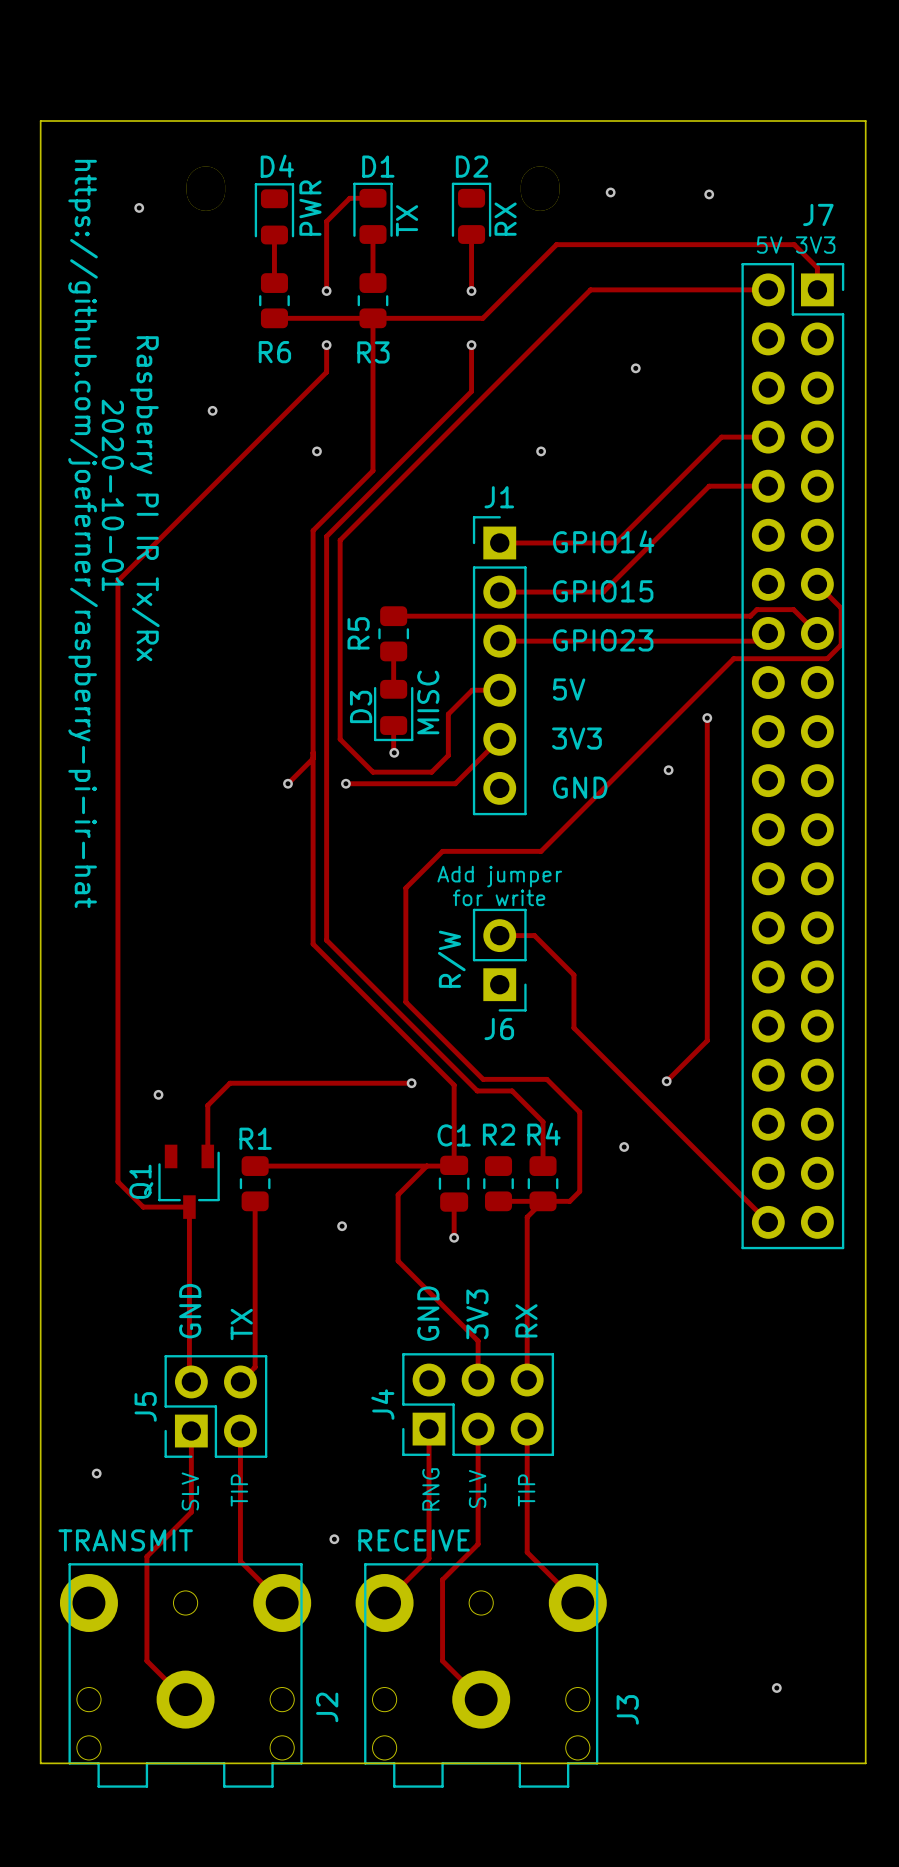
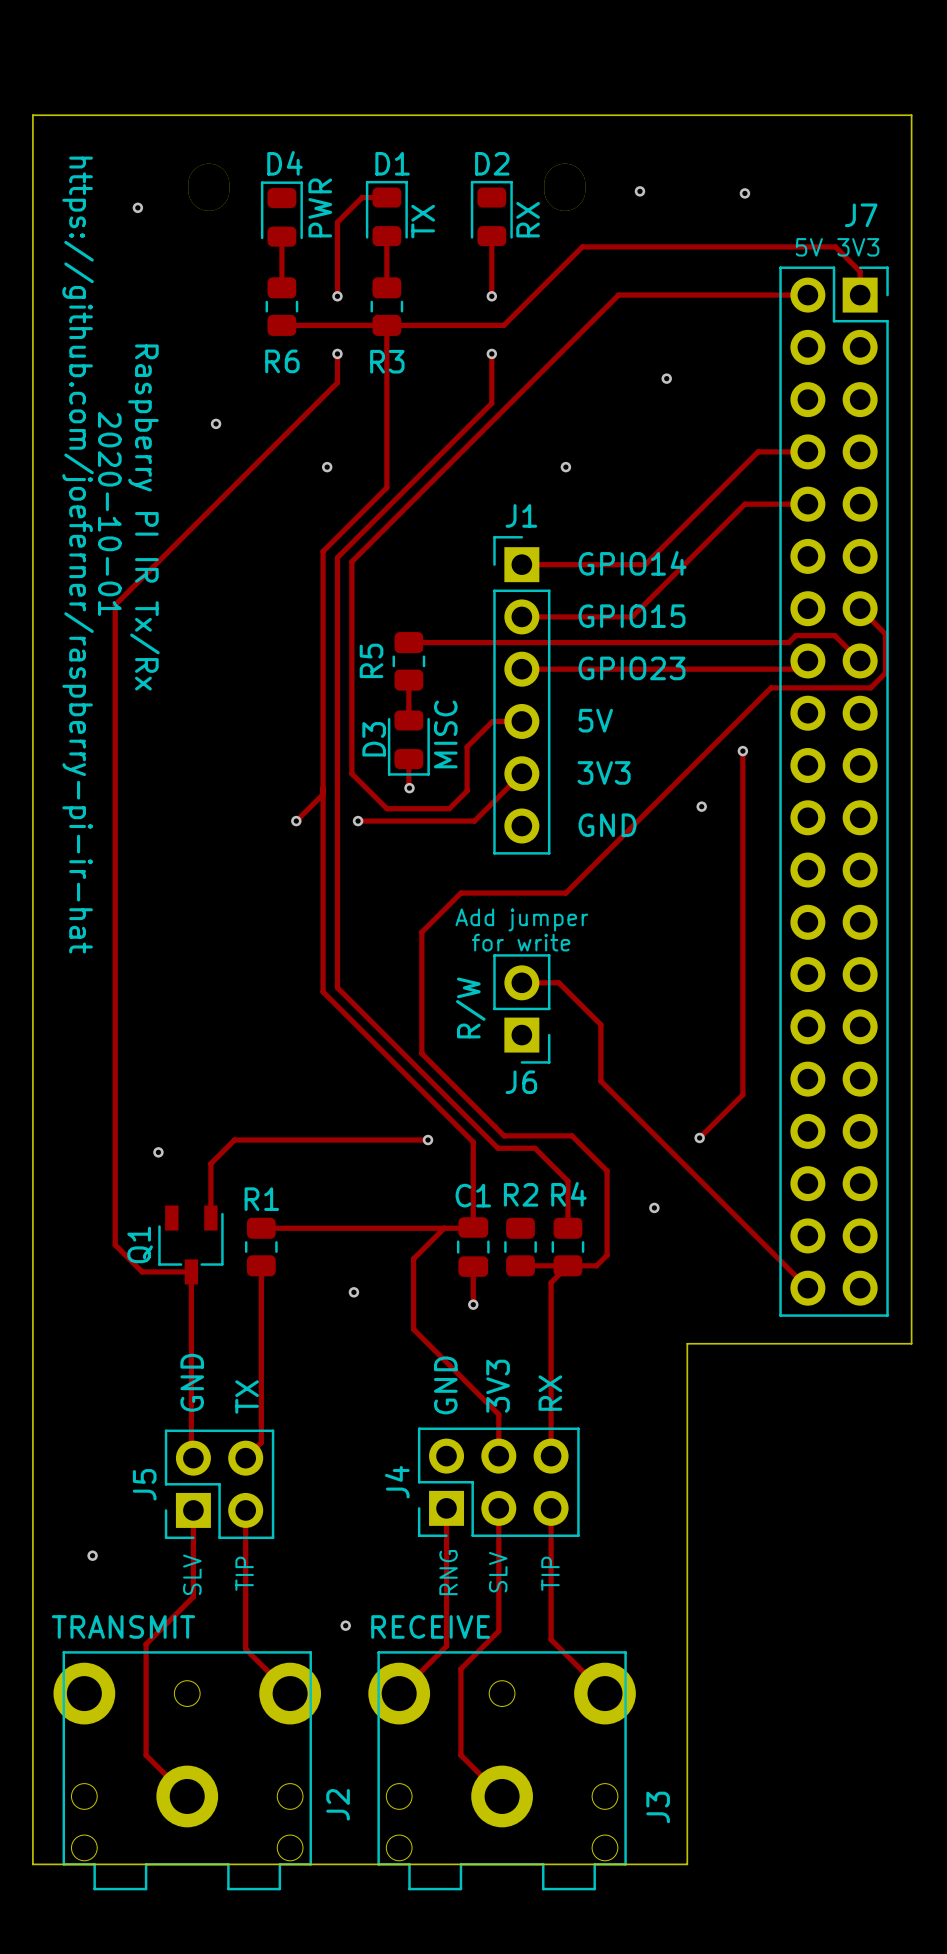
board edge: (865, 1274) (865, 1763) (655, 1763) -> (911, 1343) (687, 1343) (687, 1864)
via: (776, 1688) -> none

